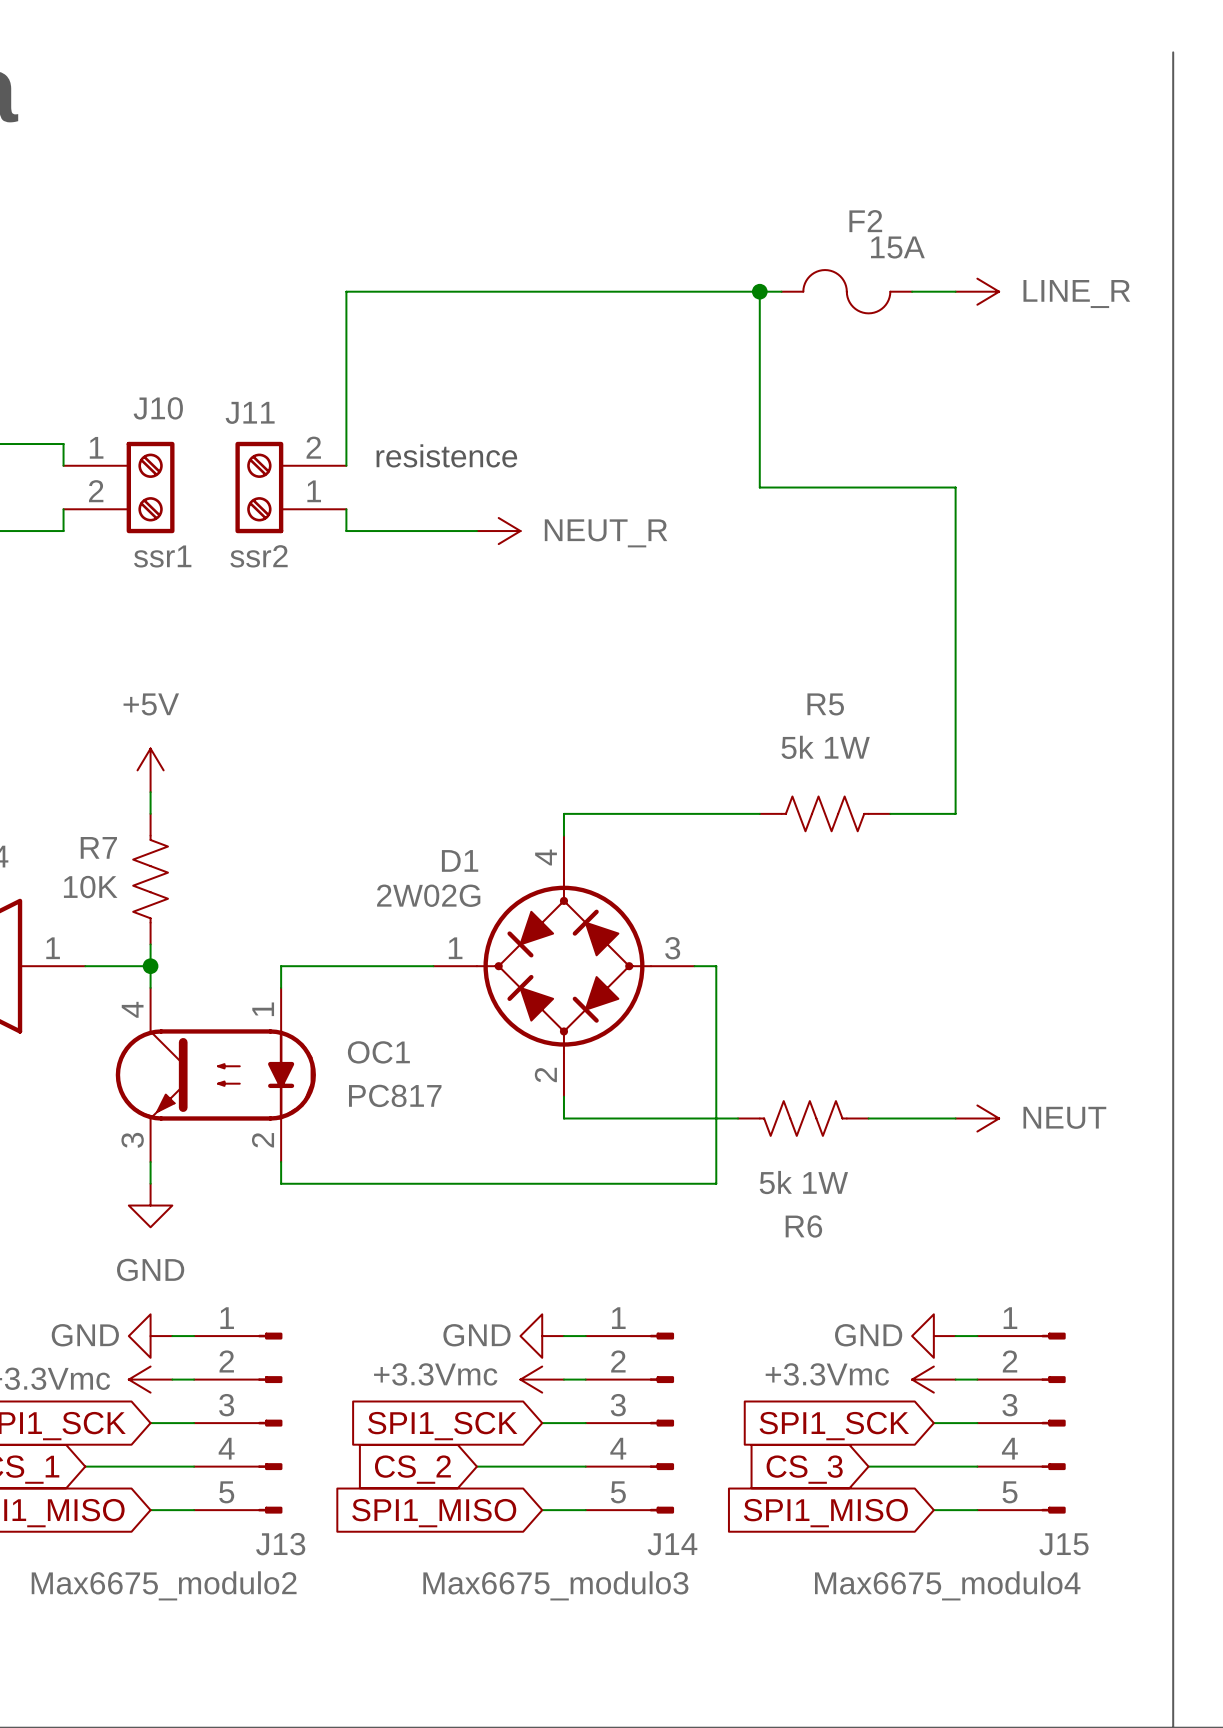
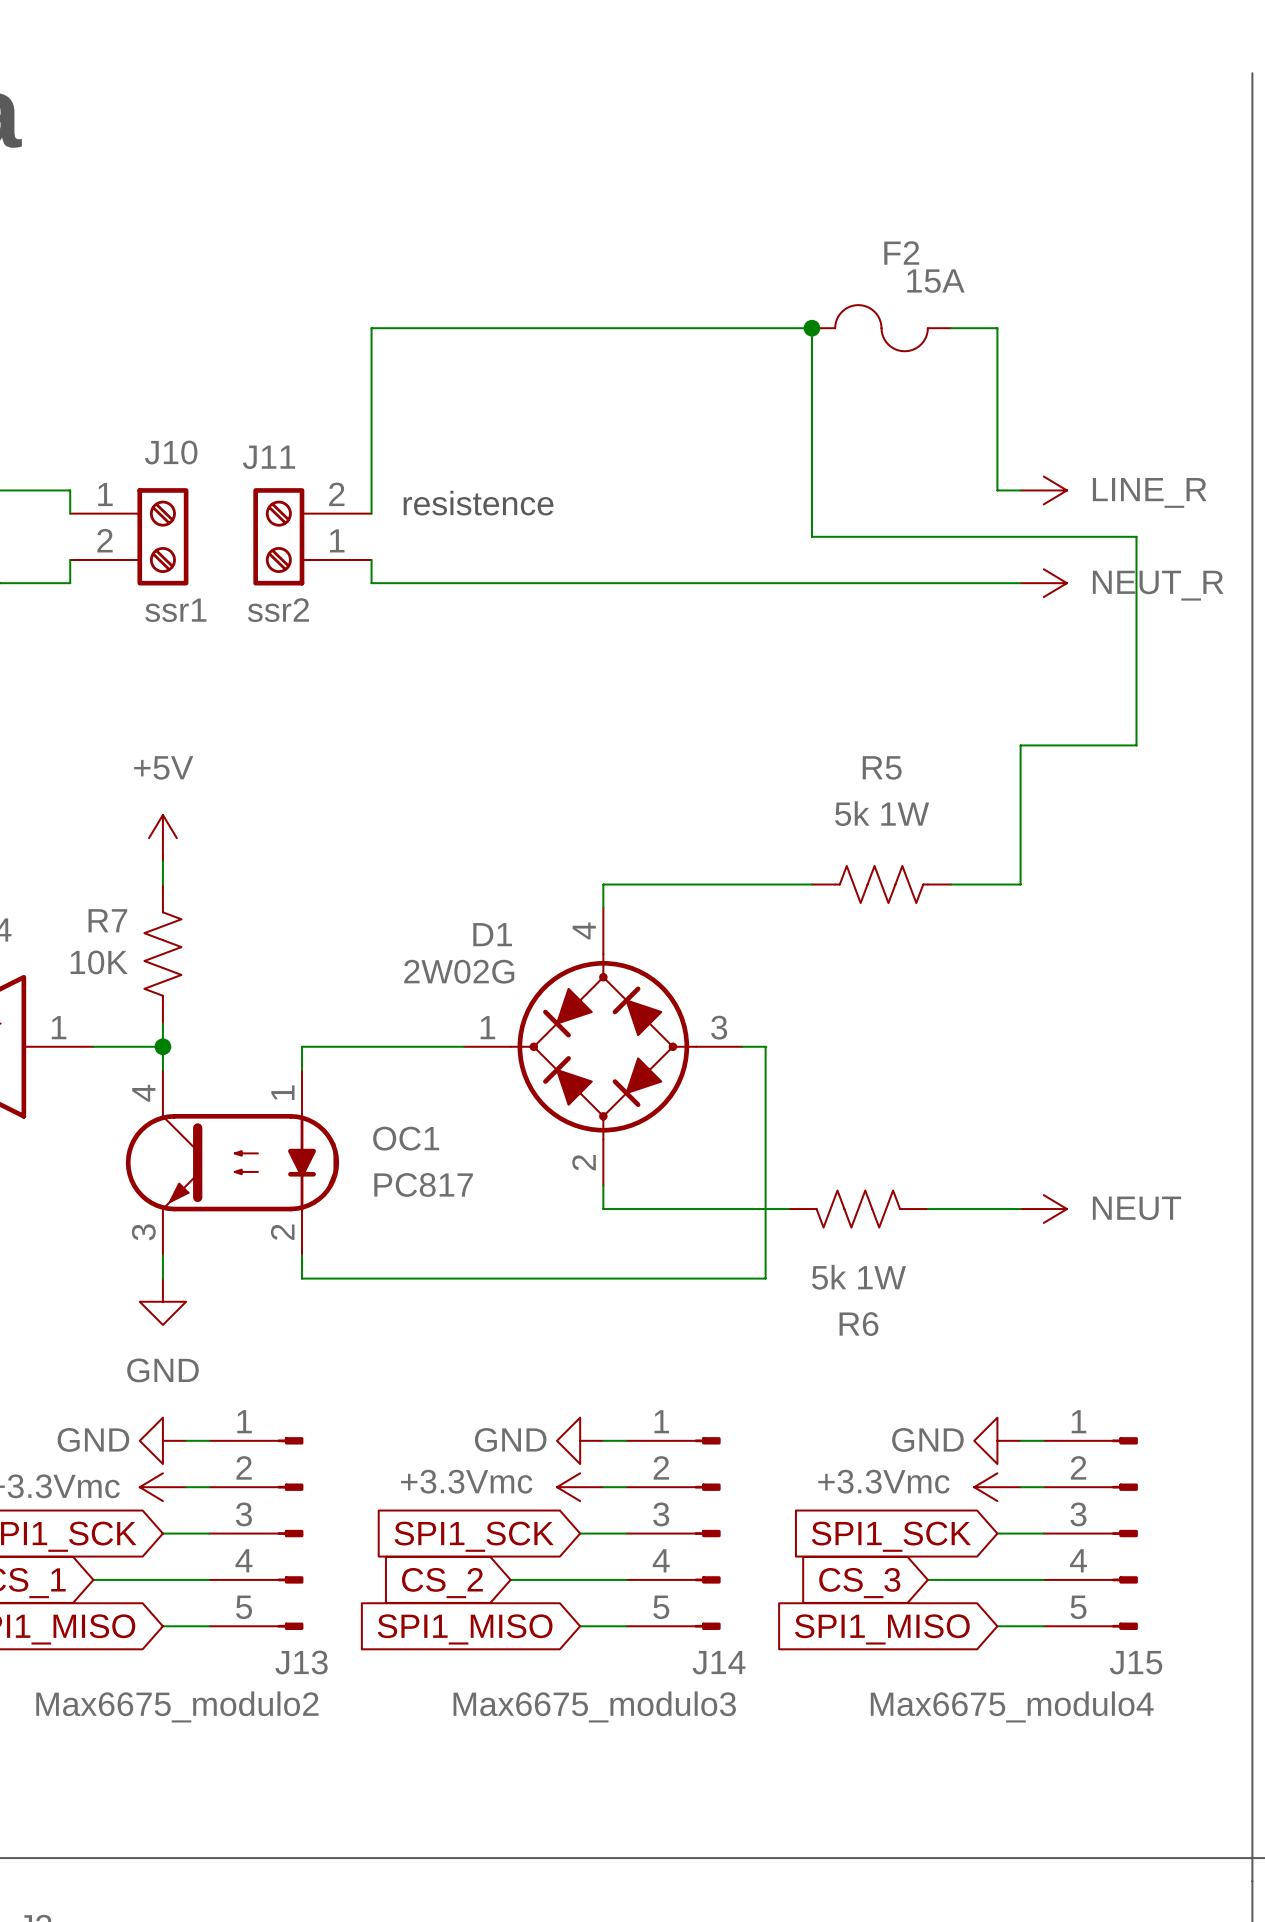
F2 position: (846, 291) -> (881, 328)
wire: (933, 291) (955, 291) -> (997, 328) (997, 490) (1020, 490)
power symbol position: LINE_R (977, 291) -> LINE_R (1043, 490)
wire: (955, 487) (955, 683) -> (1020, 536) (1136, 536) (1136, 745) (1020, 745)
wire: none -> (510, 583) (1020, 583)
power symbol: NEUT_R (498, 531) -> none
power symbol: none -> NEUT_R (1043, 583)

